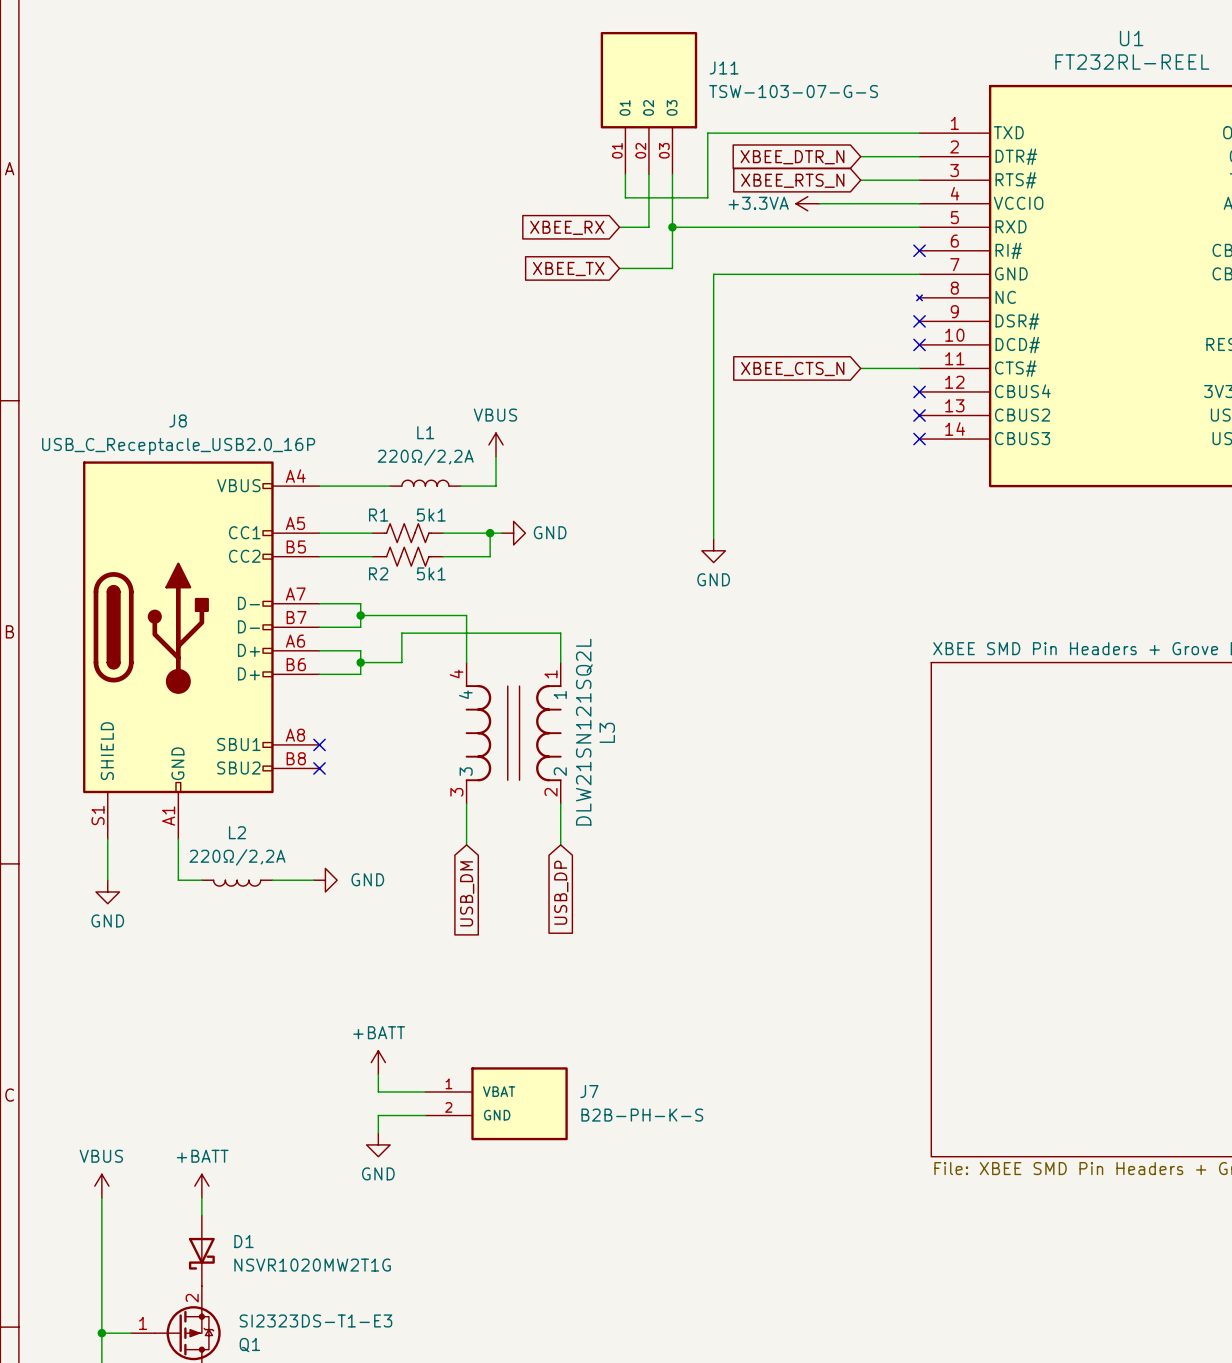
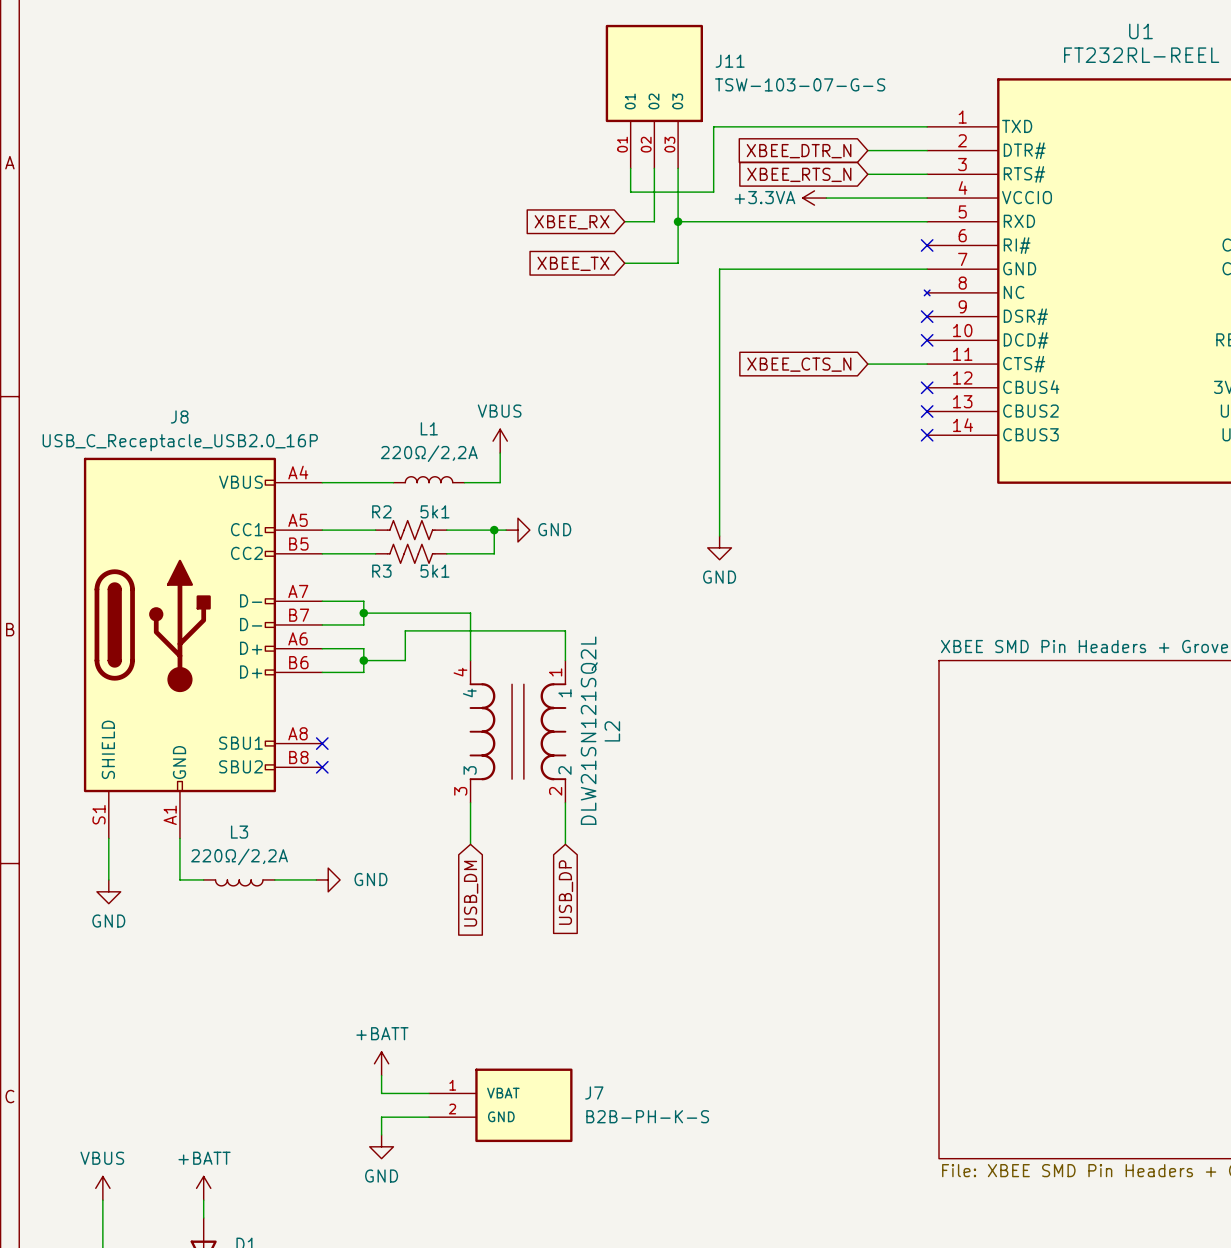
R1 name: R1 (378, 515) -> R2 (381, 511)
R2 name: R2 (378, 573) -> R3 (381, 571)
L3 name: L3 (607, 732) -> L2 (612, 731)
L2 name: L2 (237, 832) -> L3 (239, 832)

